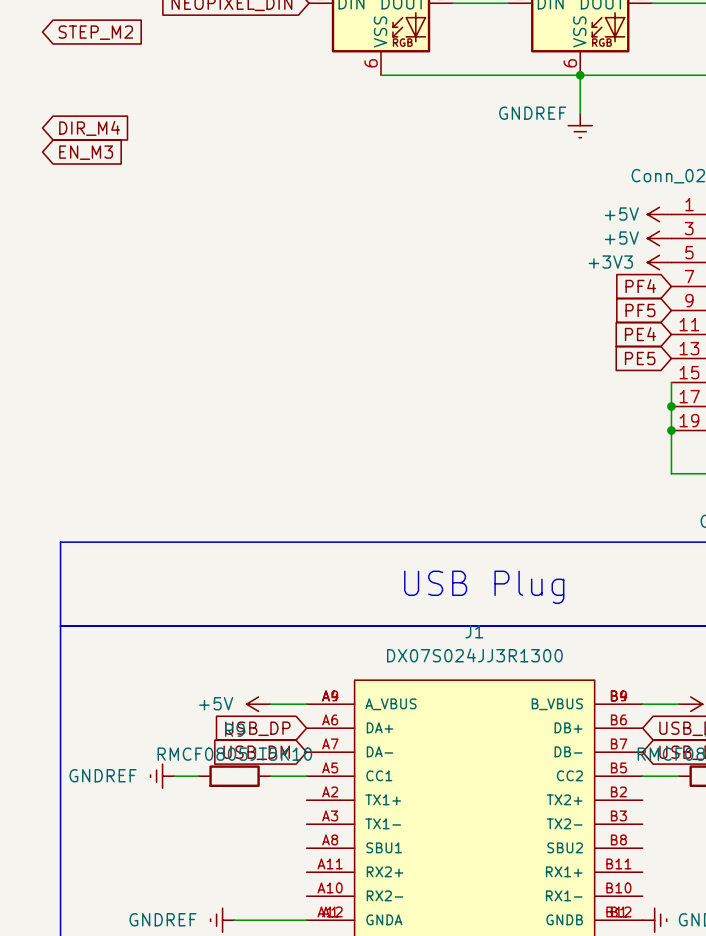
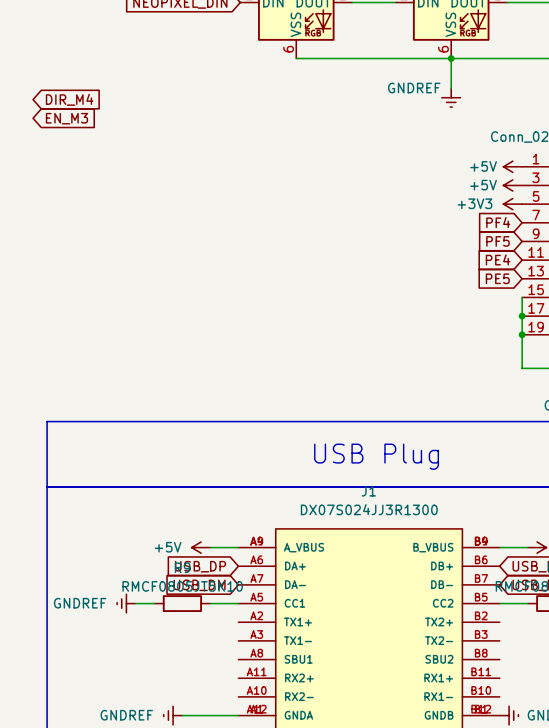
global label: STEP_M2 (95, 32) -> none

